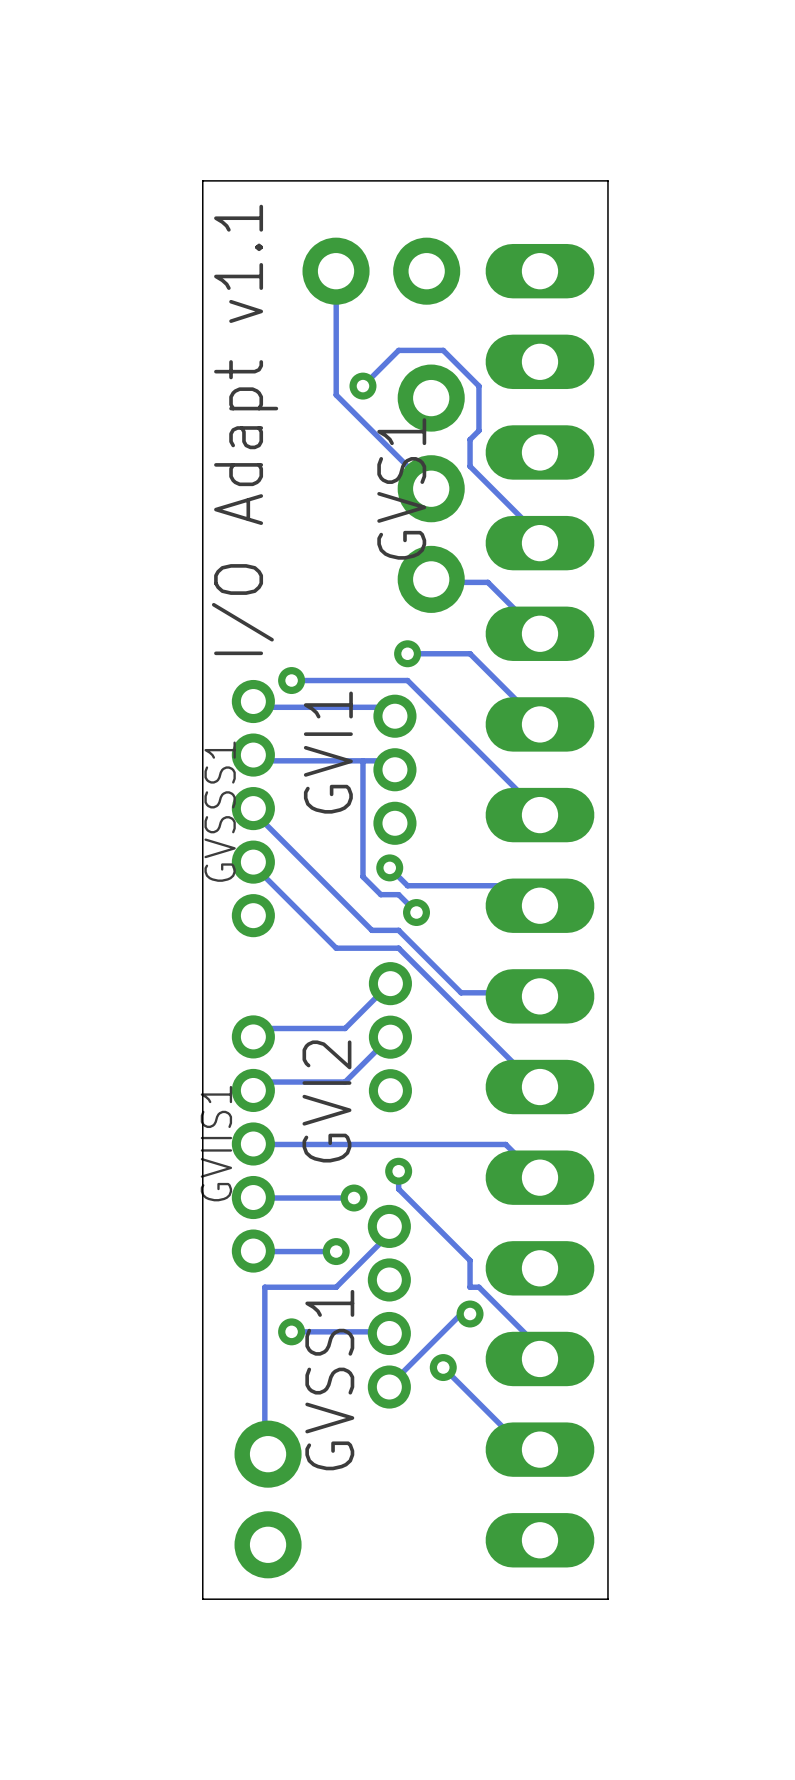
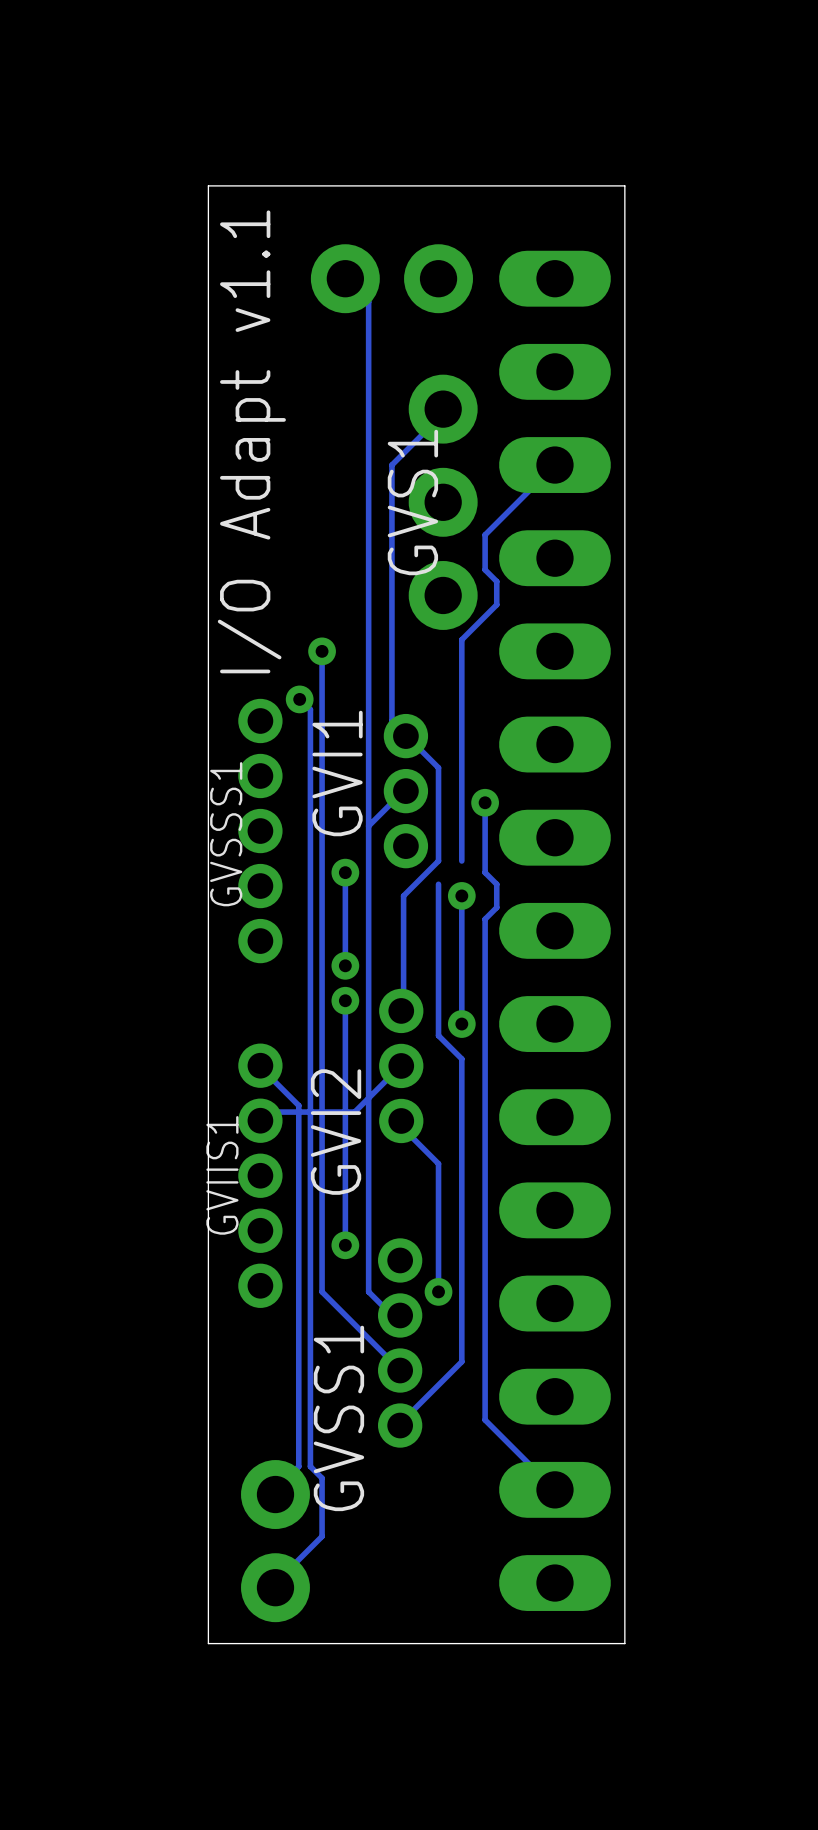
track: (336, 271) (336, 395) (431, 488) -> (345, 278) (368, 302) (368, 1291) (391, 1315) (400, 1315)
track: (362, 386) (398, 350) (443, 350) (478, 386) (478, 430) (470, 439) (470, 466) (541, 537) (539, 543) -> none
via: (362, 386) -> none
track: none -> (554, 465) (485, 534) (485, 569) (496, 581) (496, 604) (461, 639) (461, 860)
track: (431, 579) (434, 582) (487, 582) (539, 633) -> none
via: none -> (322, 651)
track: (407, 653) (470, 653) (539, 724) -> none
via: (407, 653) -> none
track: none -> (298, 697) (310, 709) (310, 1466) (322, 1478) (322, 1536) (275, 1583) (275, 1587)
track: (291, 680) (407, 680) (541, 814) (539, 815) -> none
track: (253, 701) (255, 707) (380, 707) (389, 716) (394, 716) -> none
track: (253, 755) (255, 760) (380, 760) (389, 769) (392, 769) -> (368, 826) (403, 791)
track: (362, 760) (362, 876) (380, 894) (398, 894) (416, 912) -> none
via: none -> (485, 802)
track: (253, 808) (255, 814) (371, 930) (398, 930) (461, 992) (532, 992) (539, 996) -> none
track: none -> (345, 872) (345, 965)
via: none -> (345, 872)
track: (253, 862) (255, 867) (336, 948) (398, 948) (532, 1082) (539, 1087) -> none
track: (389, 867) (407, 885) (514, 885) (532, 903) (539, 905) -> none
via: (389, 867) -> none
track: none -> (461, 895) (461, 1024)
via: none -> (461, 895)
via: (416, 912) -> none
via: none -> (345, 965)
track: none -> (345, 1000) (345, 1245)
via: none -> (345, 1000)
track: (390, 983) (345, 1028) (255, 1028) (253, 1036) -> (401, 1010) (403, 1000) (403, 895) (438, 860) (438, 767) (391, 721) (391, 465) (438, 418) (443, 409)
via: none -> (461, 1024)
track: none -> (401, 1120) (403, 1128) (438, 1163) (438, 1291)
track: (253, 1143) (505, 1144) (539, 1177) -> none
track: (398, 1171) (398, 1189) (470, 1260) (470, 1287) (478, 1287) (532, 1340) (532, 1358) (539, 1358) -> none
via: (398, 1171) -> none
track: (253, 1197) (354, 1198) -> none
via position: (354, 1198) -> (345, 1245)
track: (389, 1226) (389, 1233) (336, 1287) (264, 1287) (264, 1447) (268, 1454) -> (260, 1065) (298, 1105) (298, 1466) (275, 1489) (275, 1494)
track: (253, 1251) (336, 1251) -> none
via: (336, 1251) -> none
via: none -> (438, 1291)
track: (470, 1314) (461, 1314) (389, 1387) -> (438, 884) (438, 1035) (461, 1058) (461, 1361) (400, 1425)
via: (470, 1314) -> none
track: (291, 1331) (389, 1333) -> (322, 651) (322, 1291) (400, 1370)
via: (291, 1331) -> none
track: (443, 1367) (523, 1447) (539, 1449) -> (485, 802) (485, 872) (496, 884) (496, 907) (485, 919) (485, 1419) (554, 1489)
via: (443, 1367) -> none

